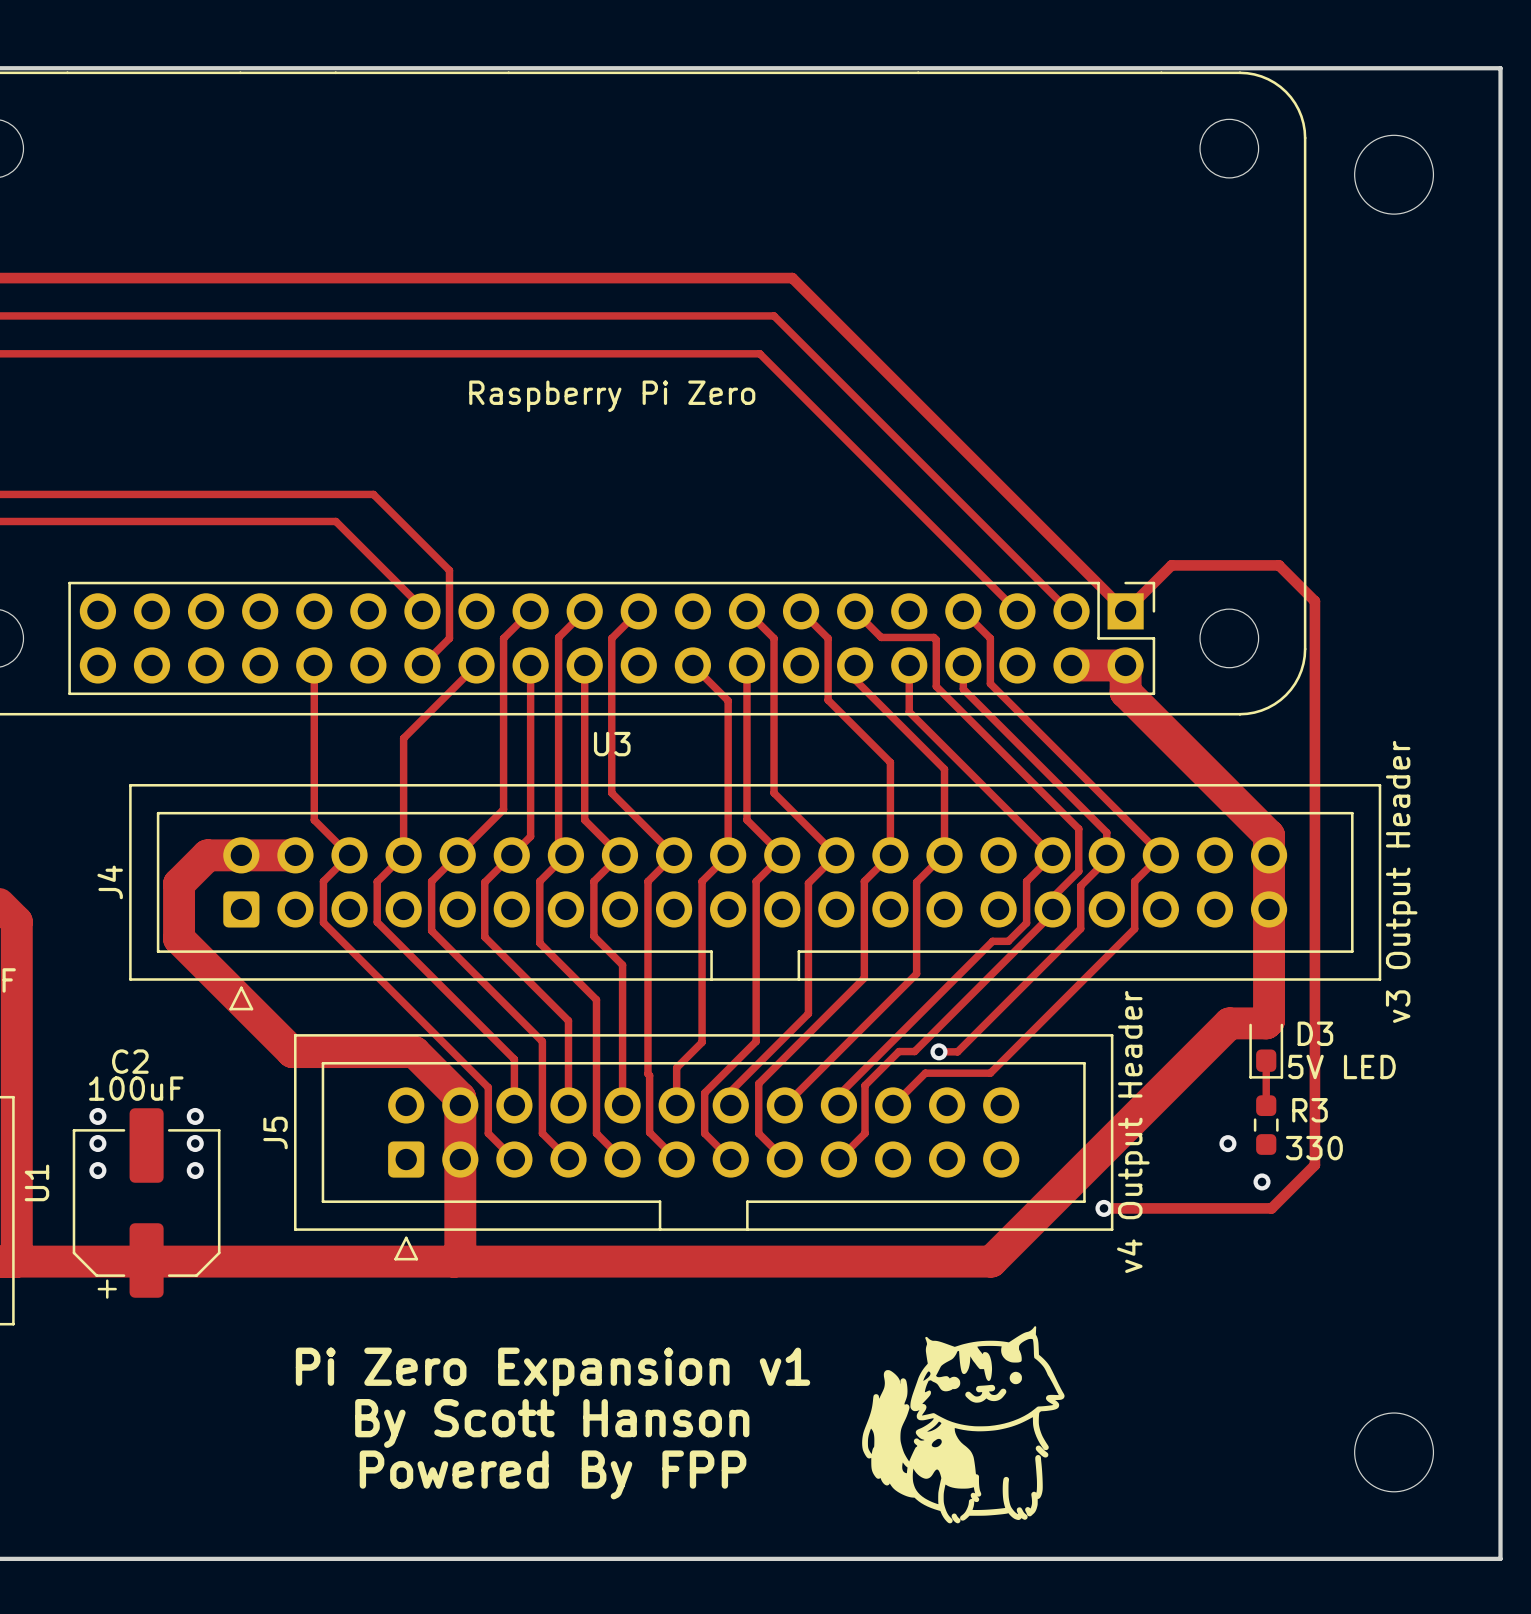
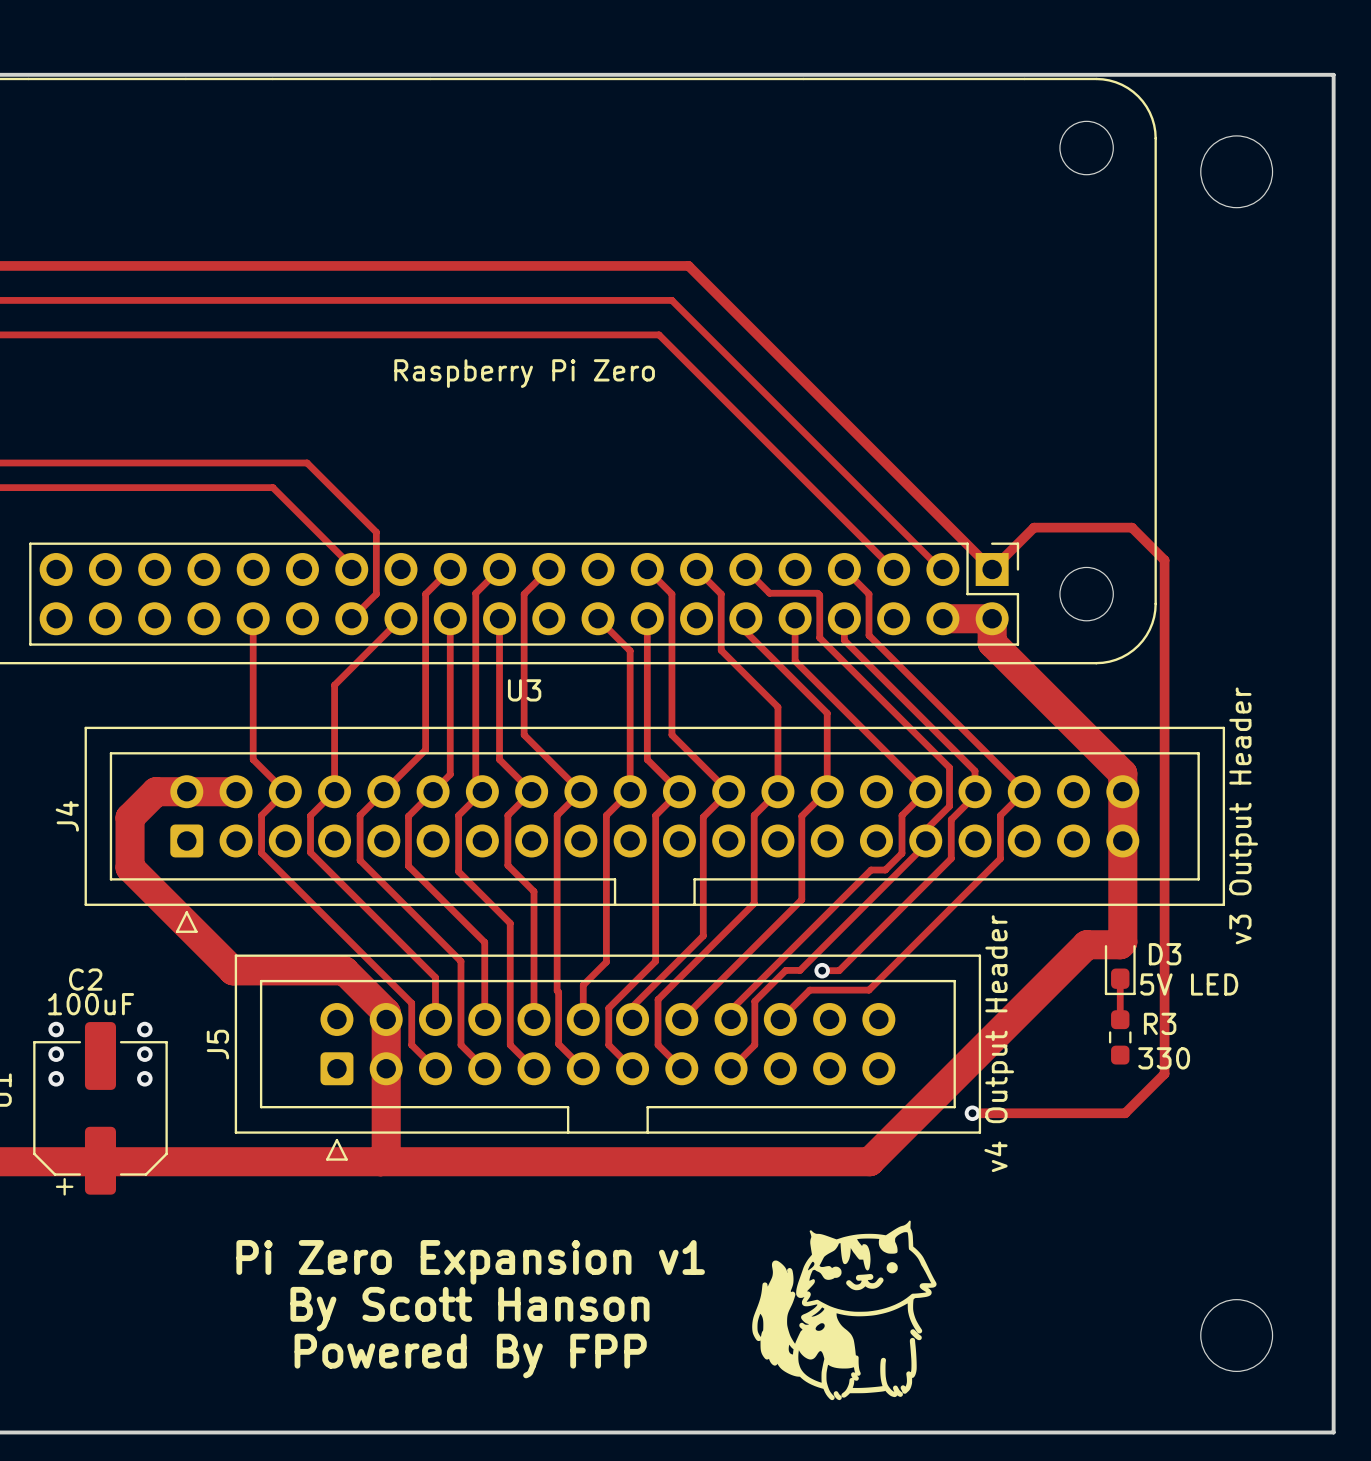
via: (1227, 1143) -> none
via: (1262, 1181) -> none

